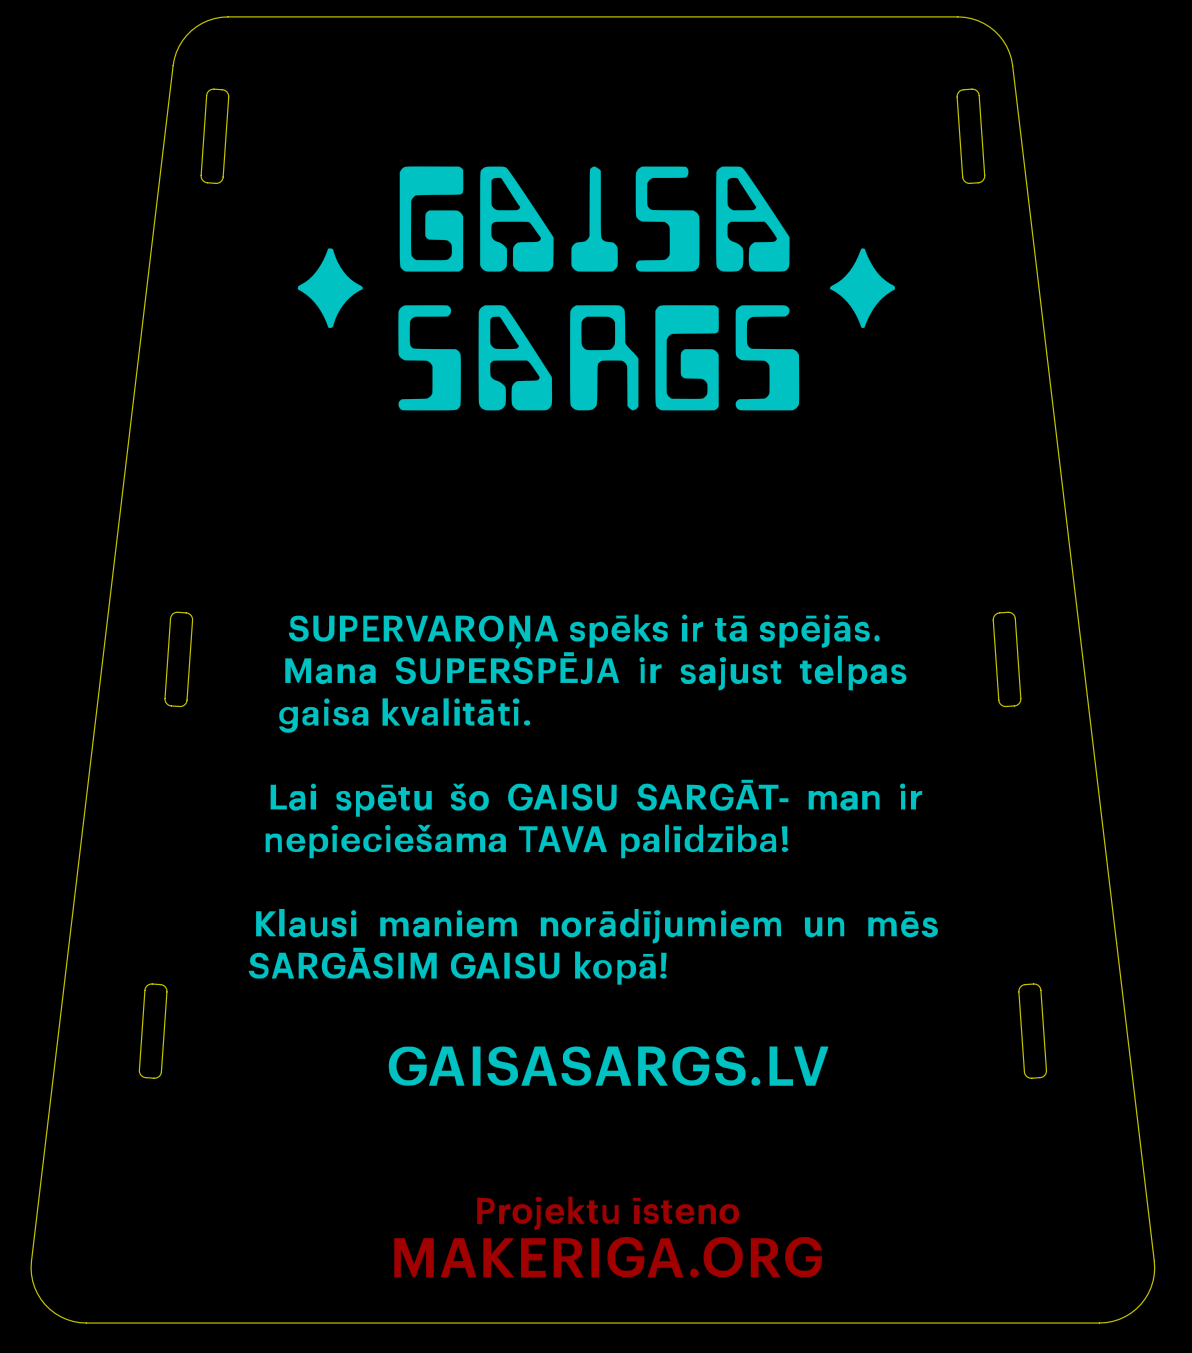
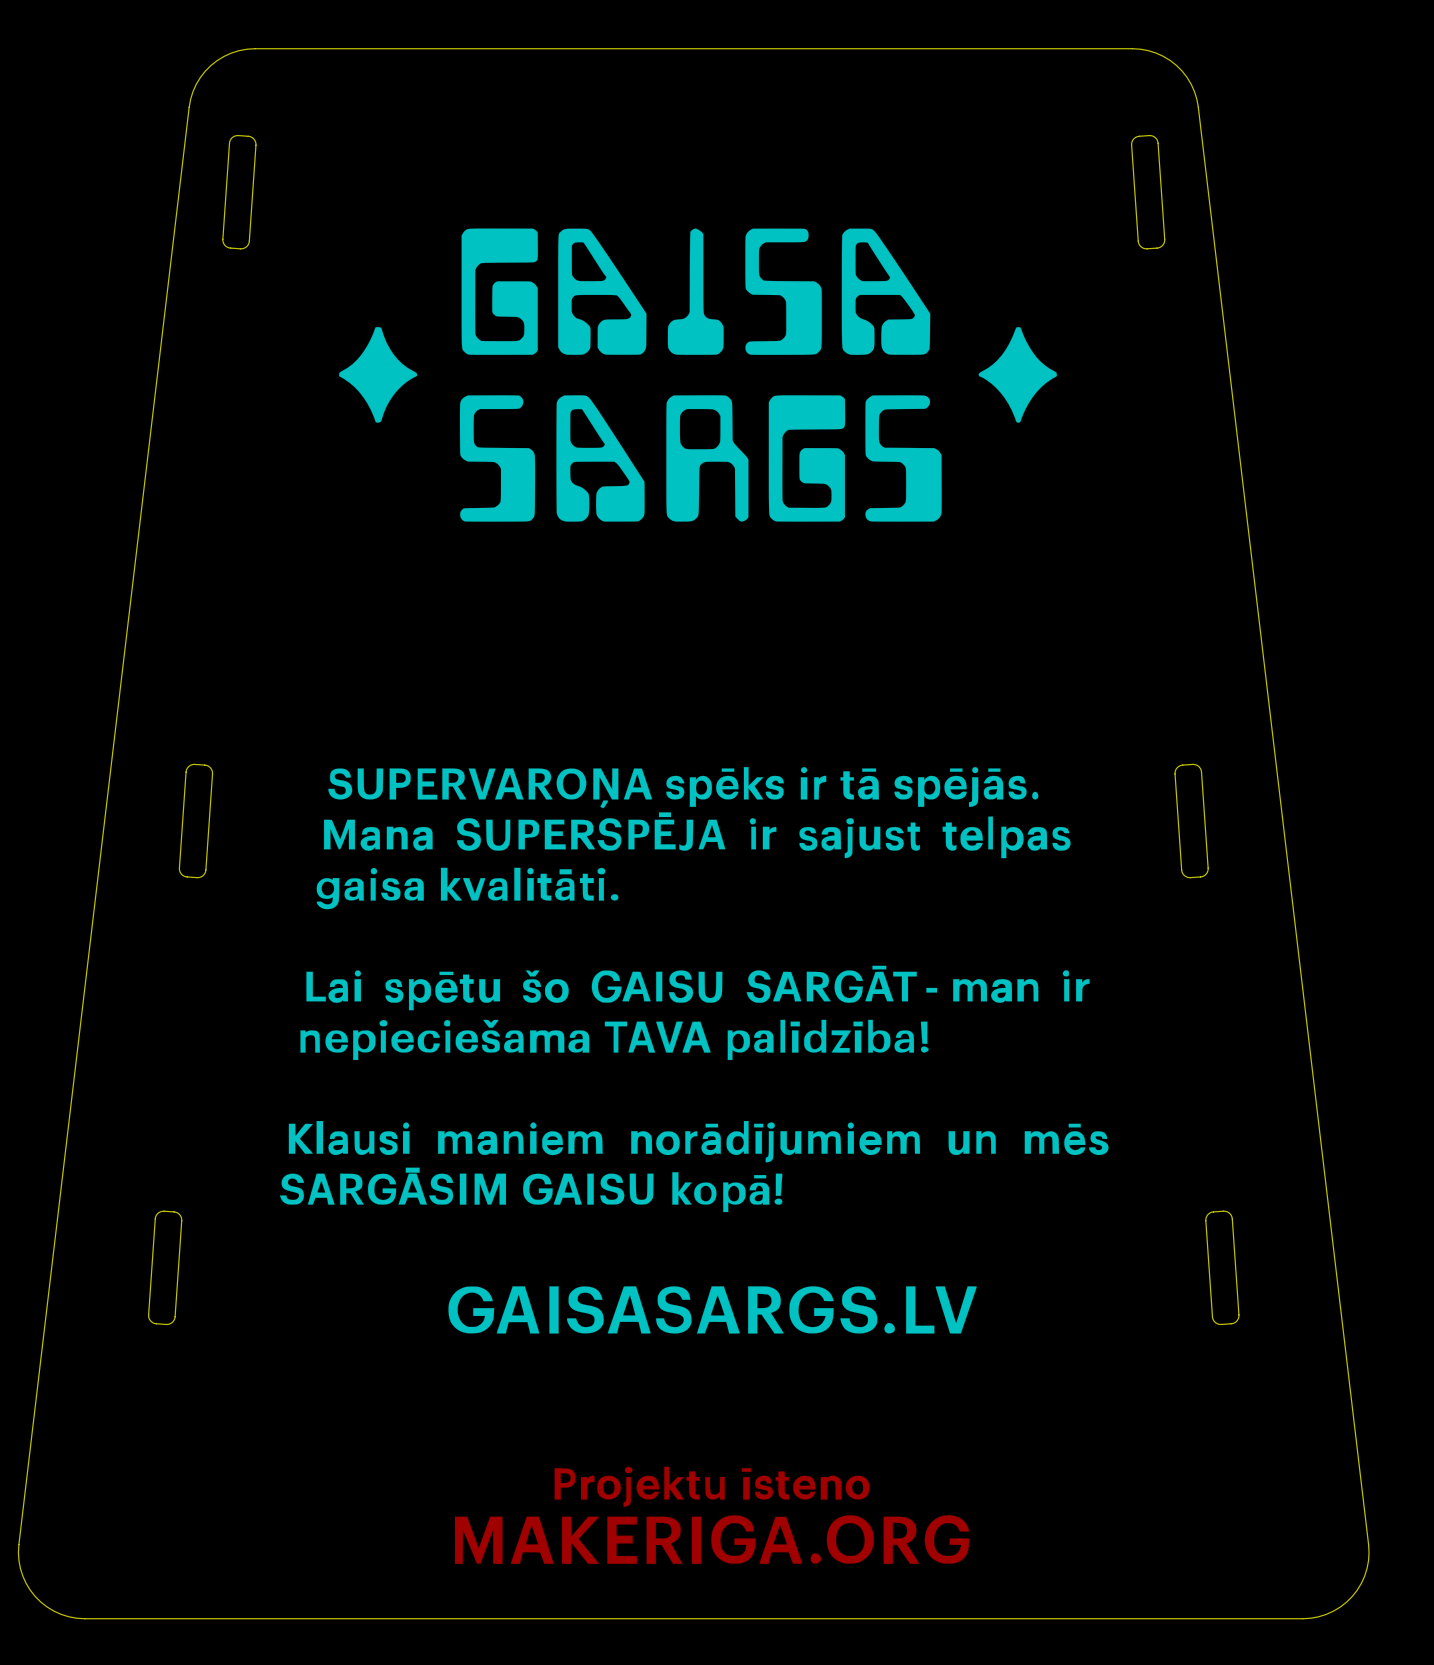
drawing shape: [248, 166, 938, 1278] -> [280, 228, 1109, 1564]

